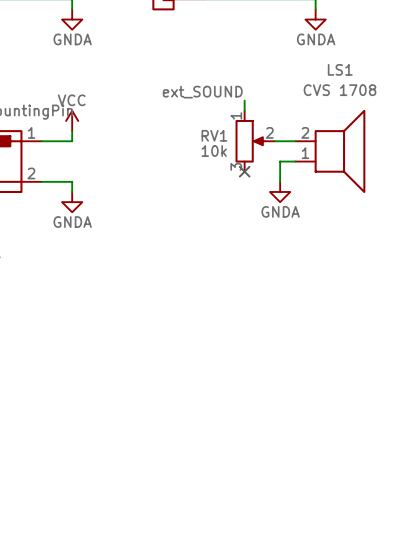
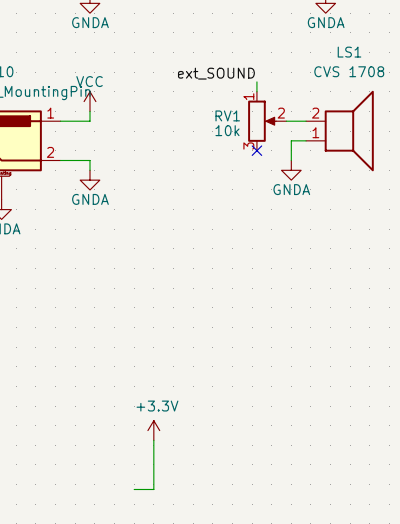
power symbol: none -> +3.3V (153, 430)
wire: none -> (153, 440) (153, 489) (134, 489)

